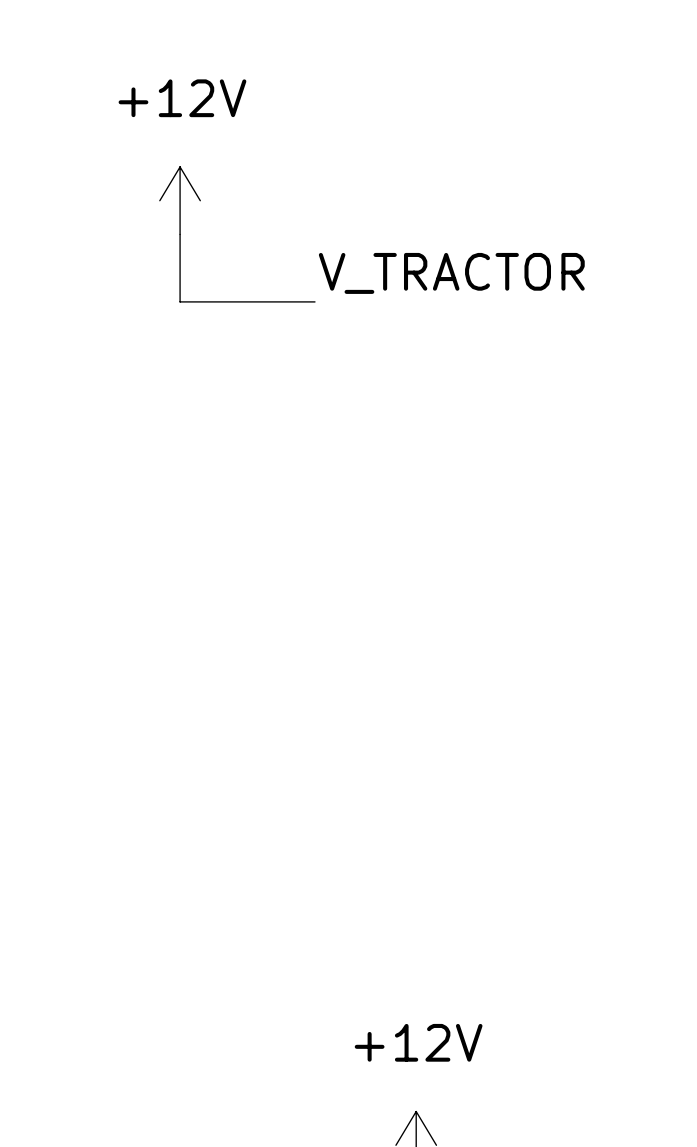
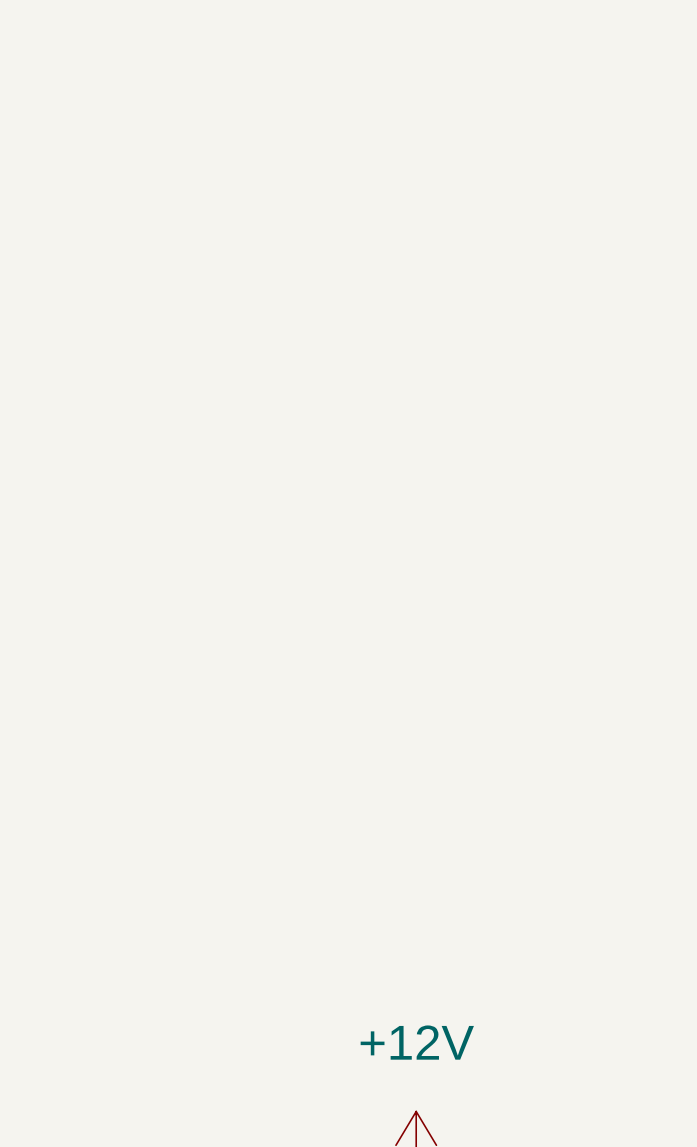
power symbol: +12V (180, 200) -> none
wire: (180, 234) (180, 301) (315, 301) -> none
label: V_TRACTOR (451, 273) -> none

